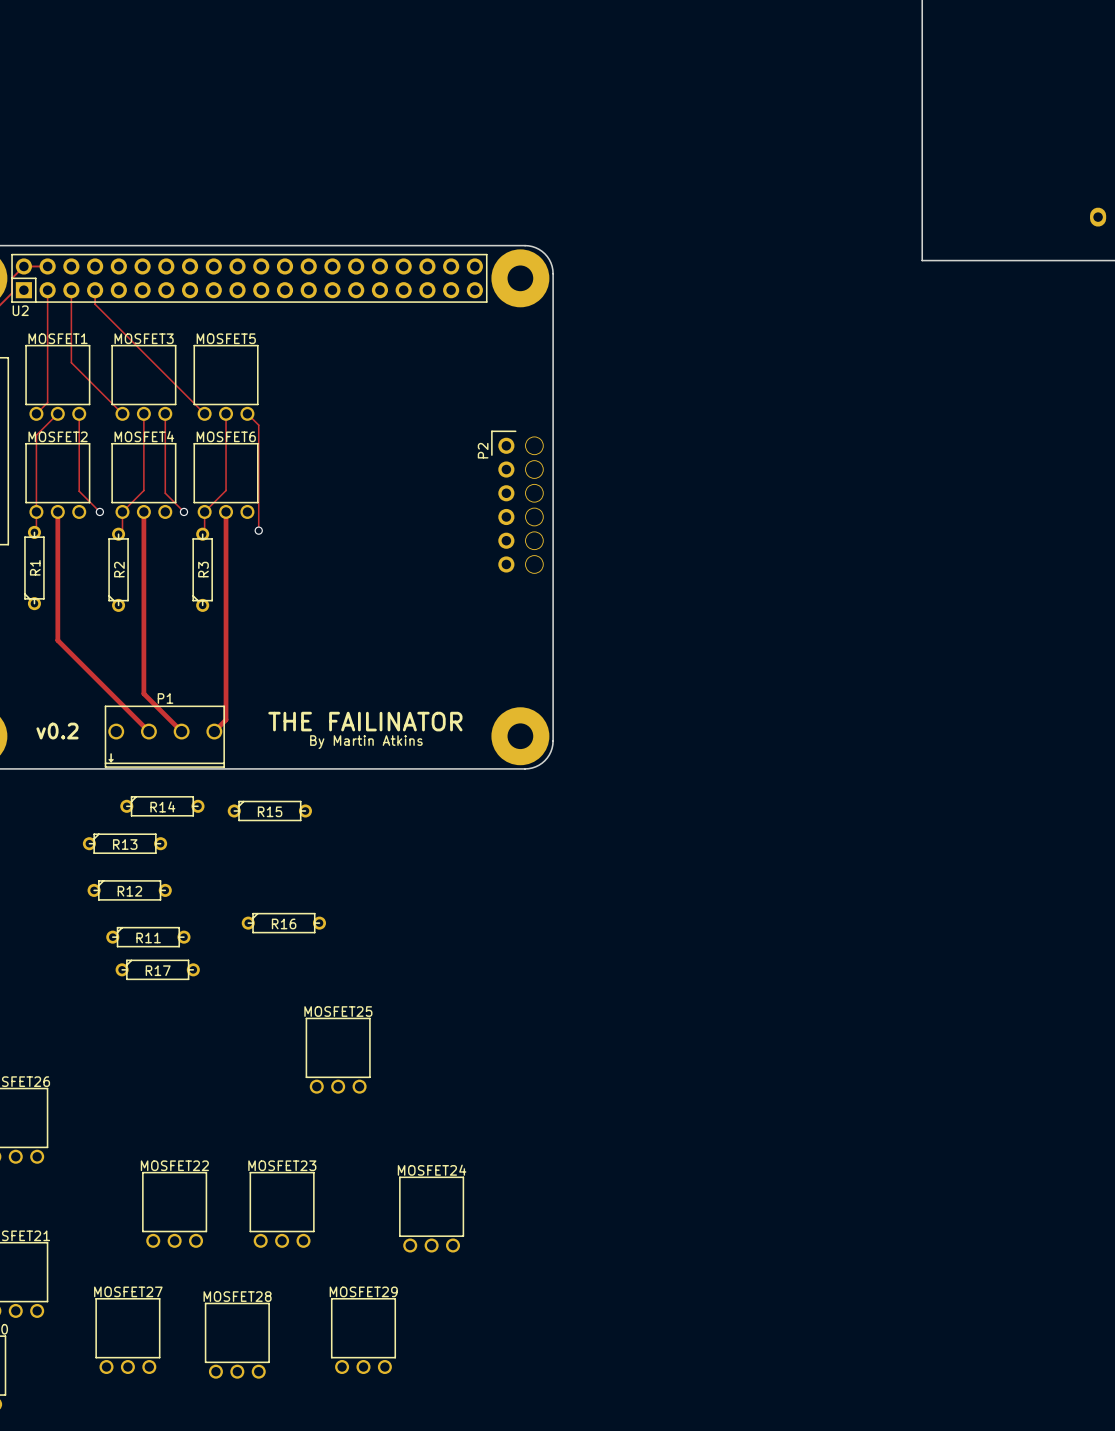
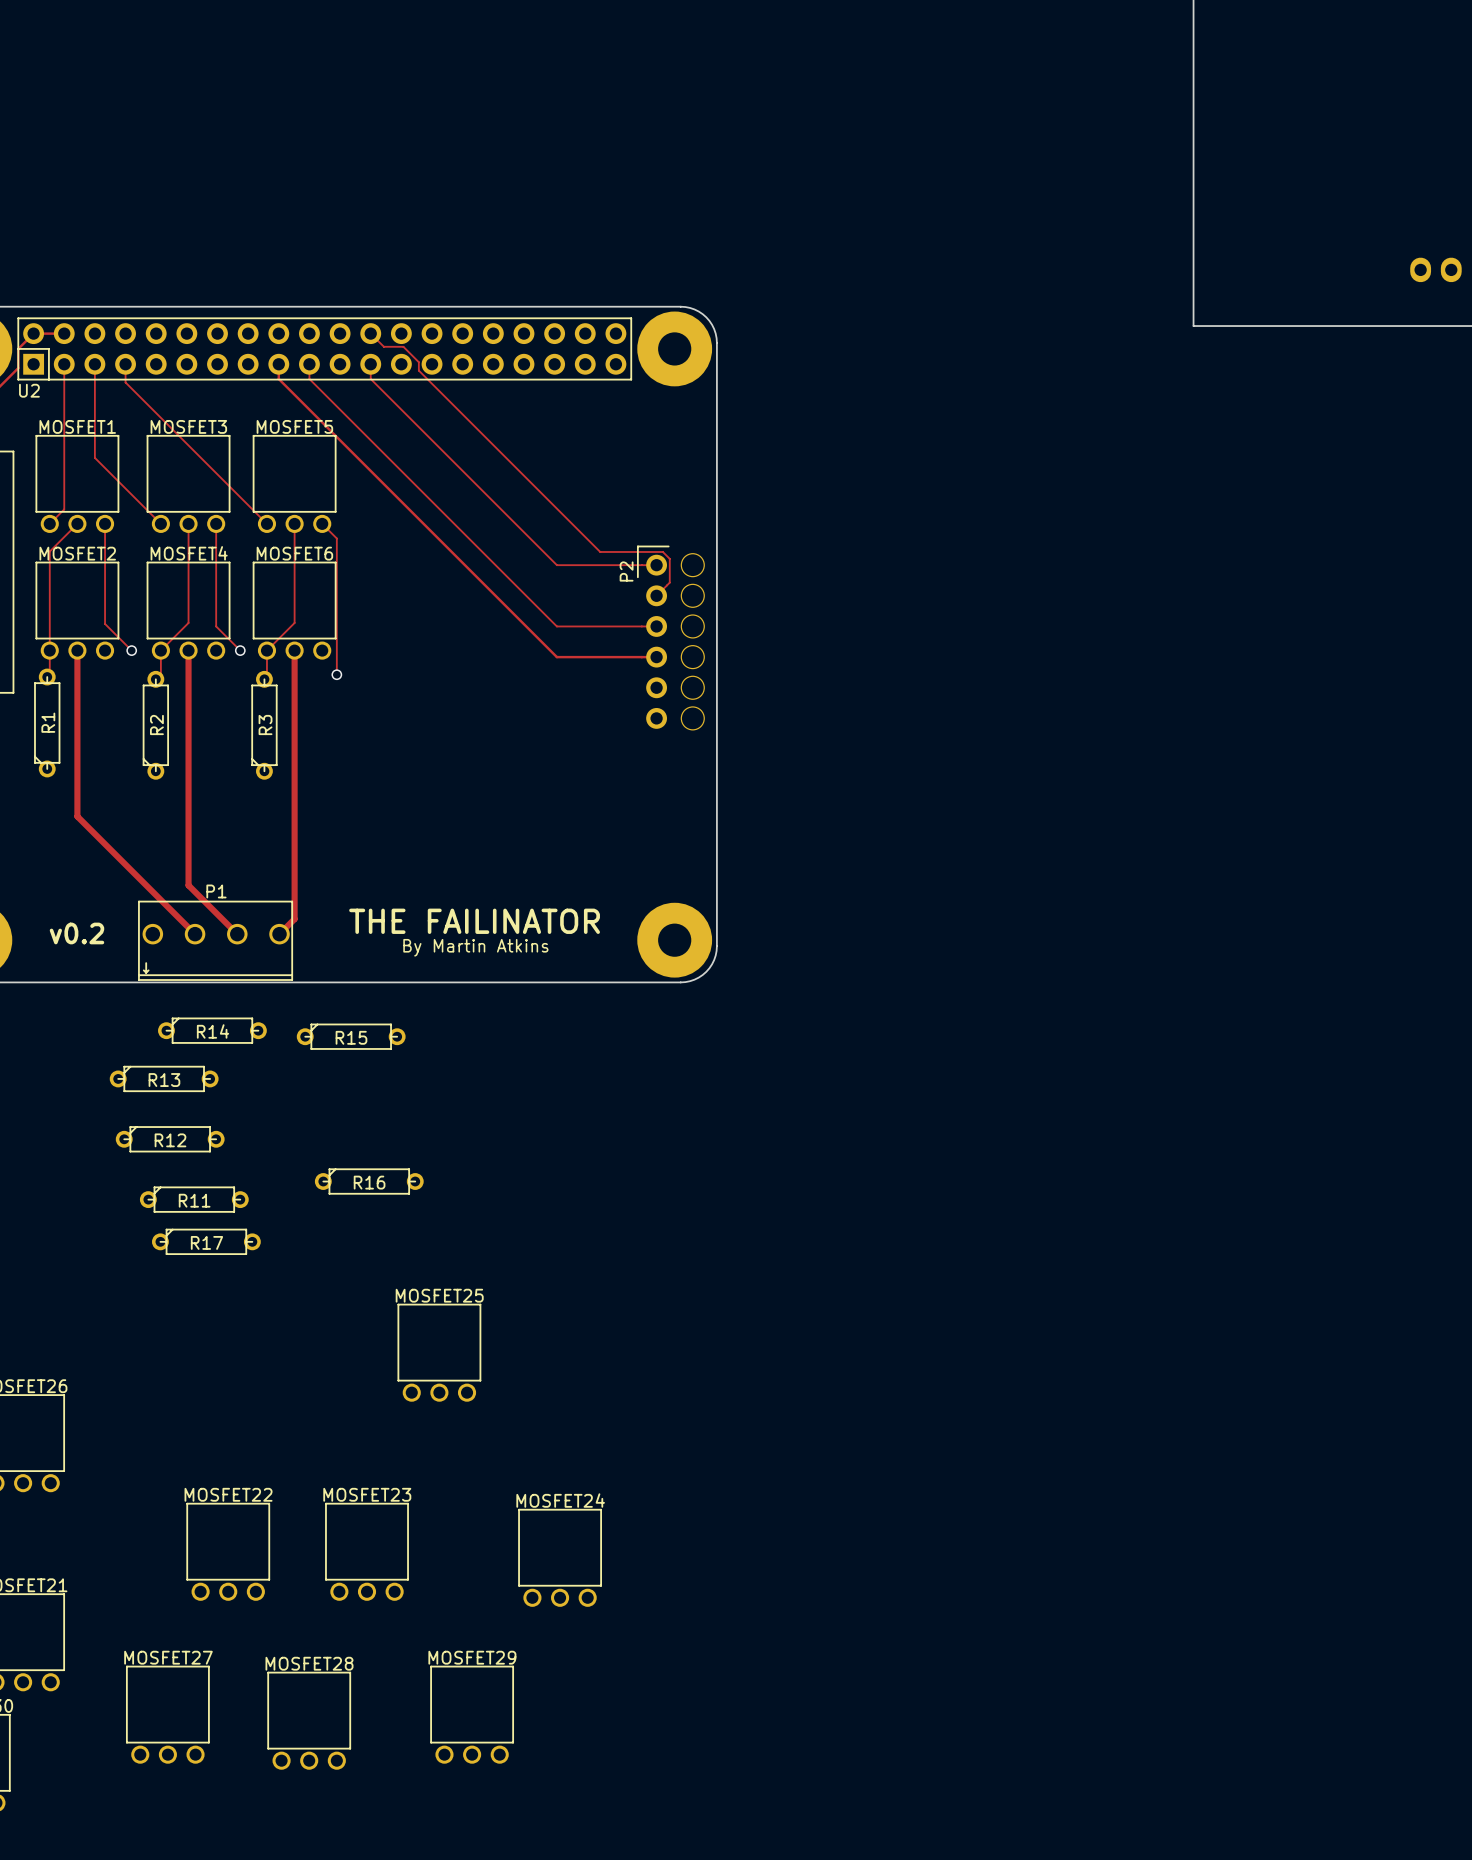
track: none -> (370, 333) (383, 346) (403, 346) (418, 362) (418, 370) (600, 551) (662, 551) (669, 558) (669, 582) (656, 595)
track: none -> (278, 364) (278, 379) (556, 657) (656, 657)
track: none -> (309, 364) (309, 379) (556, 626) (656, 626)
track: none -> (370, 364) (370, 379) (556, 565) (656, 565)

